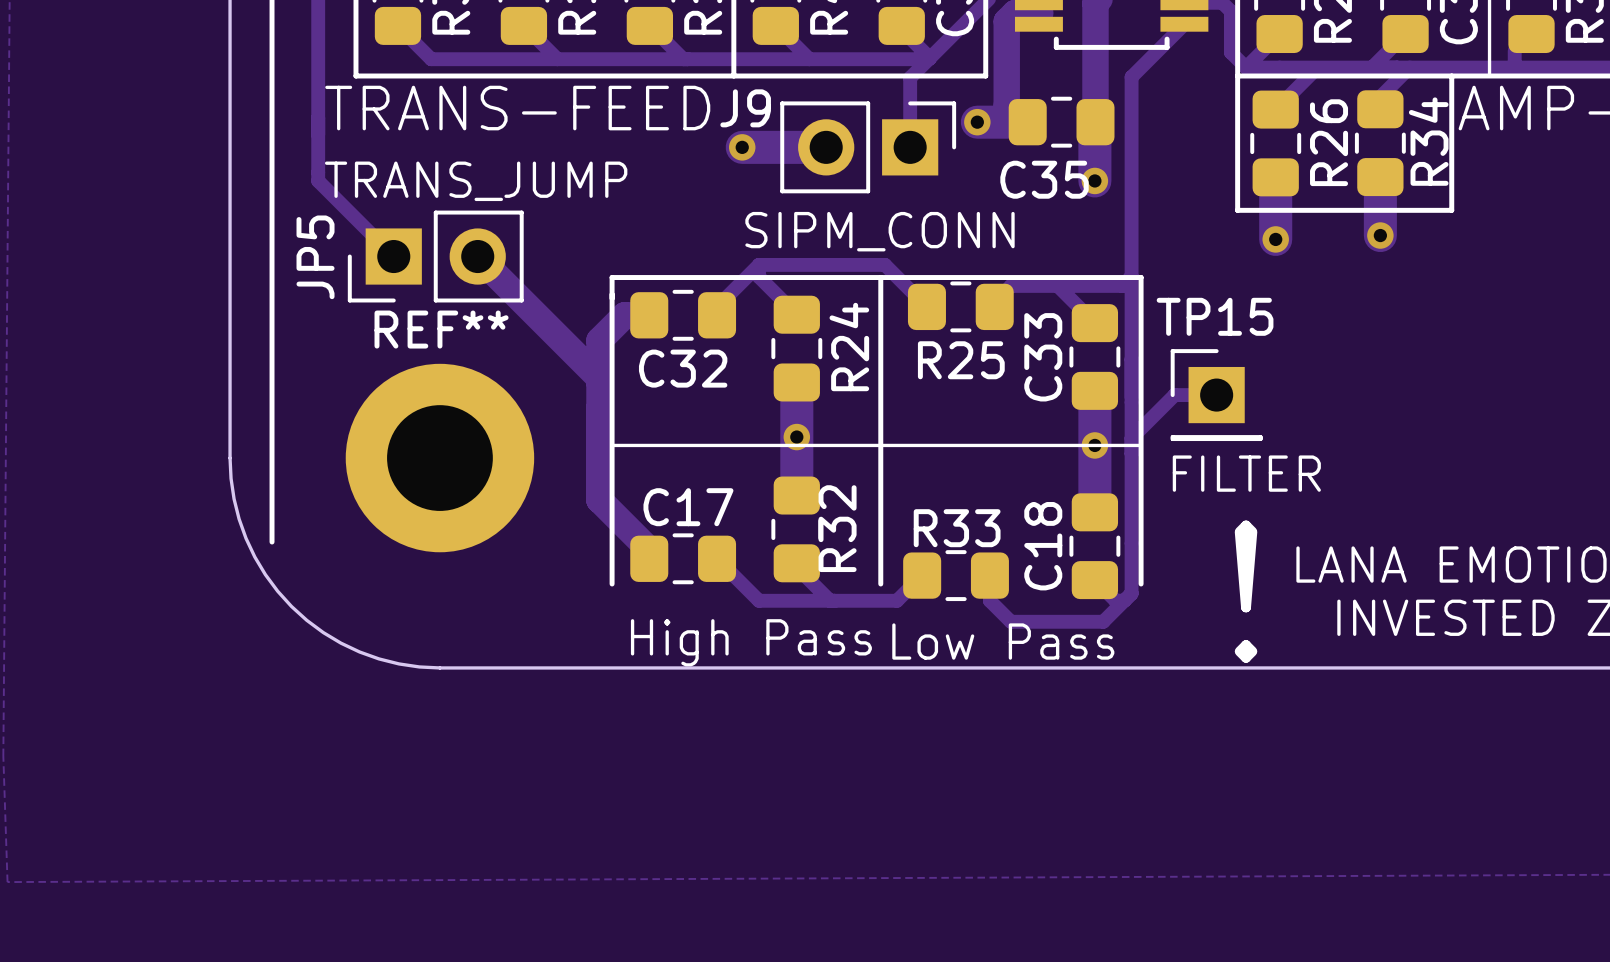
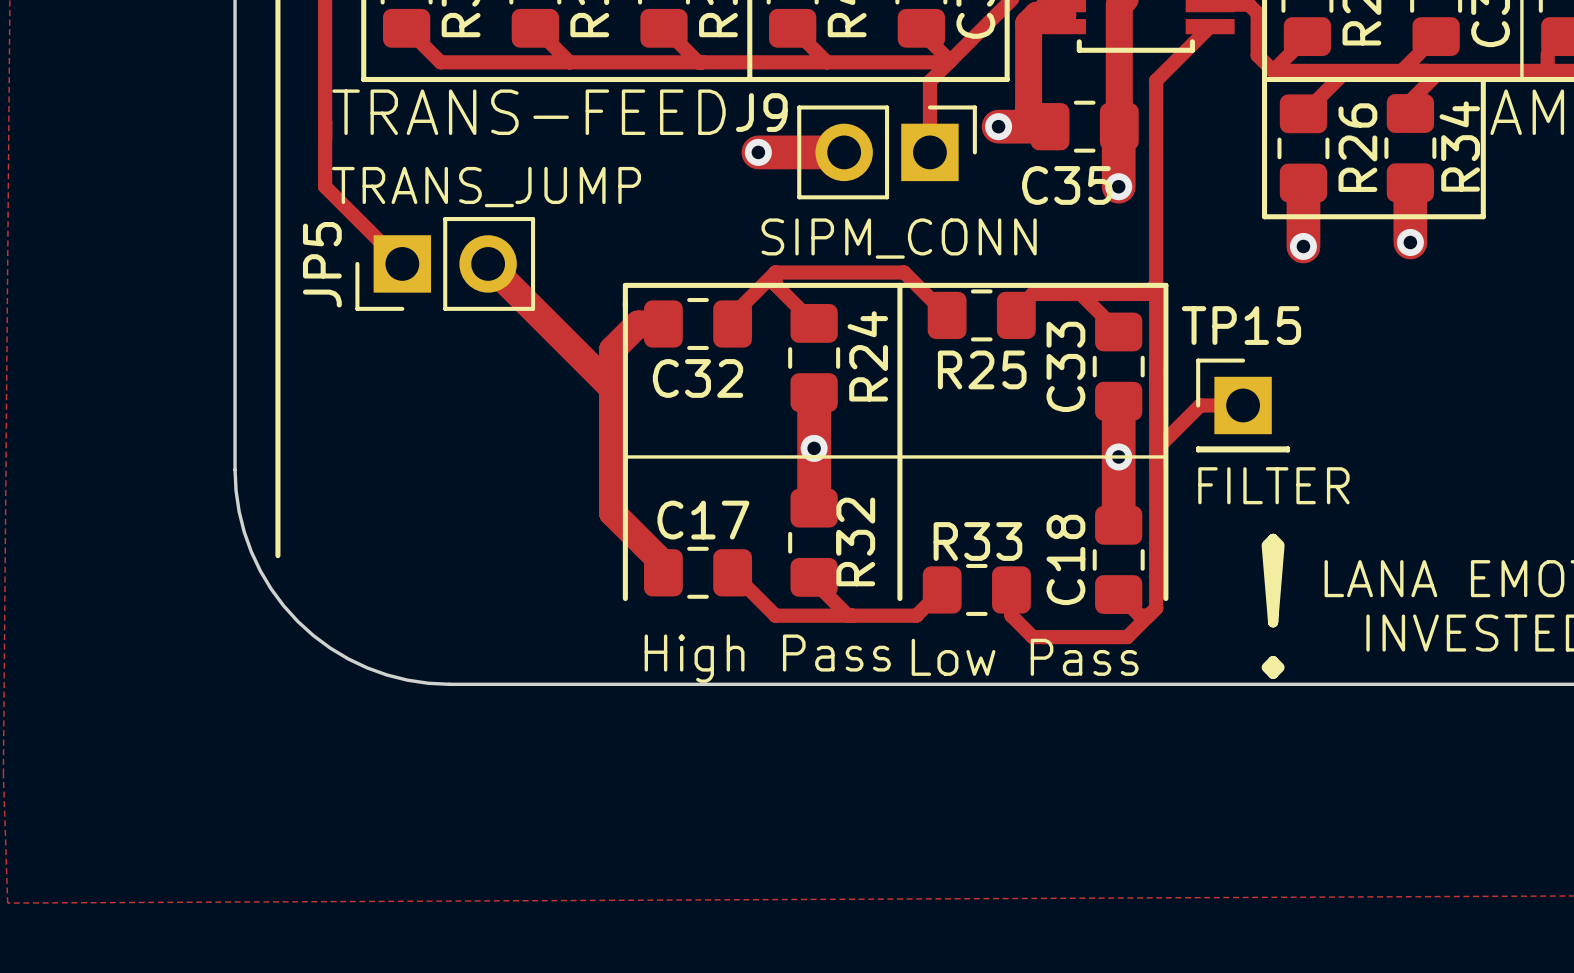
REF**: (439, 458) -> none

